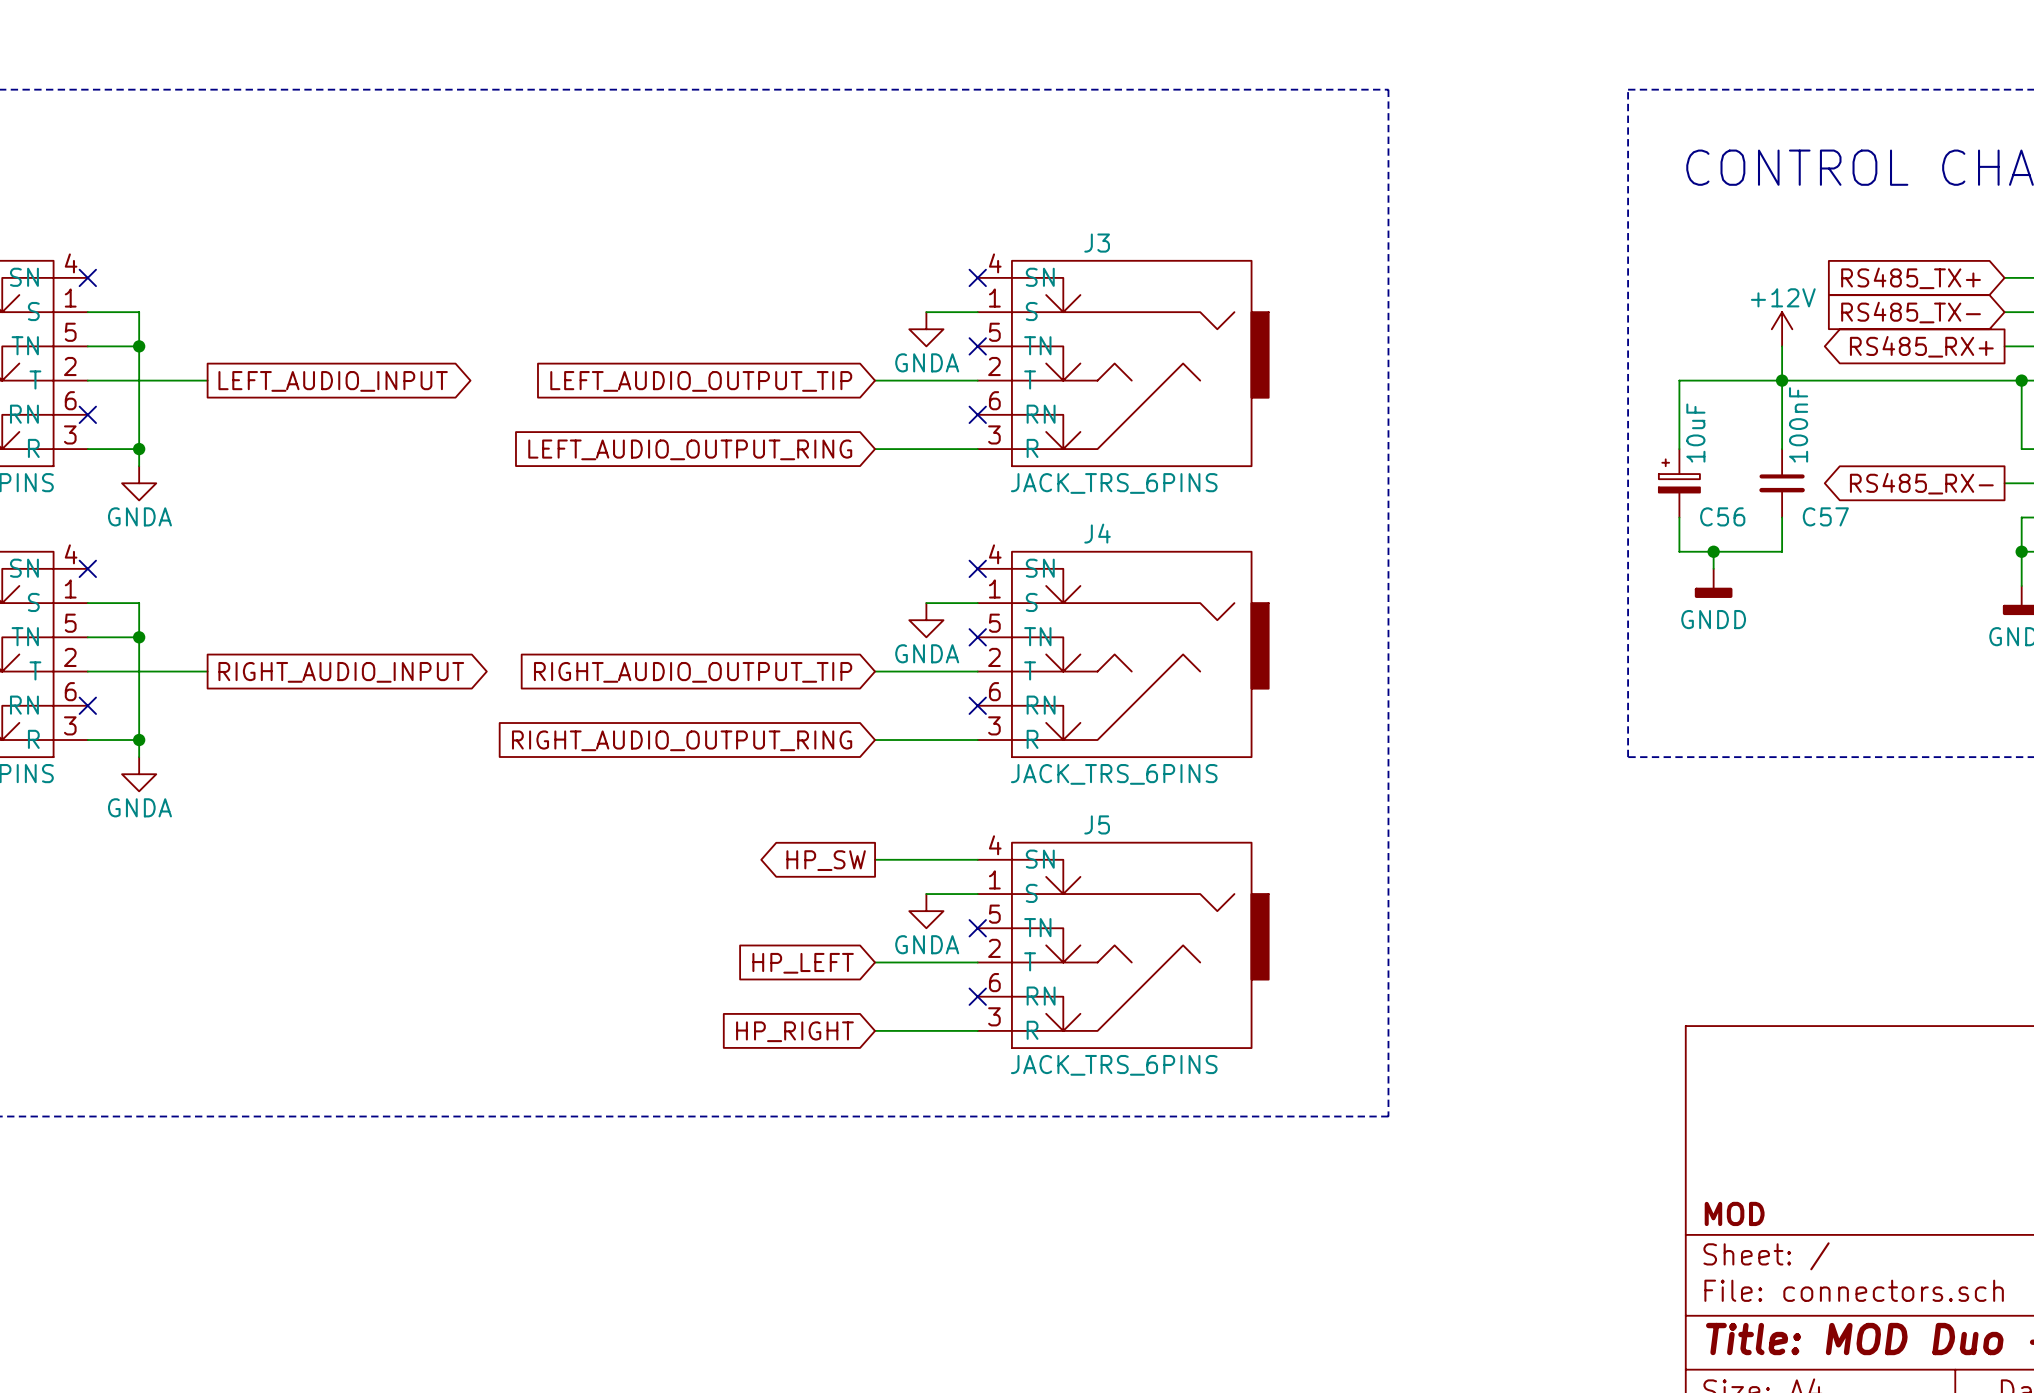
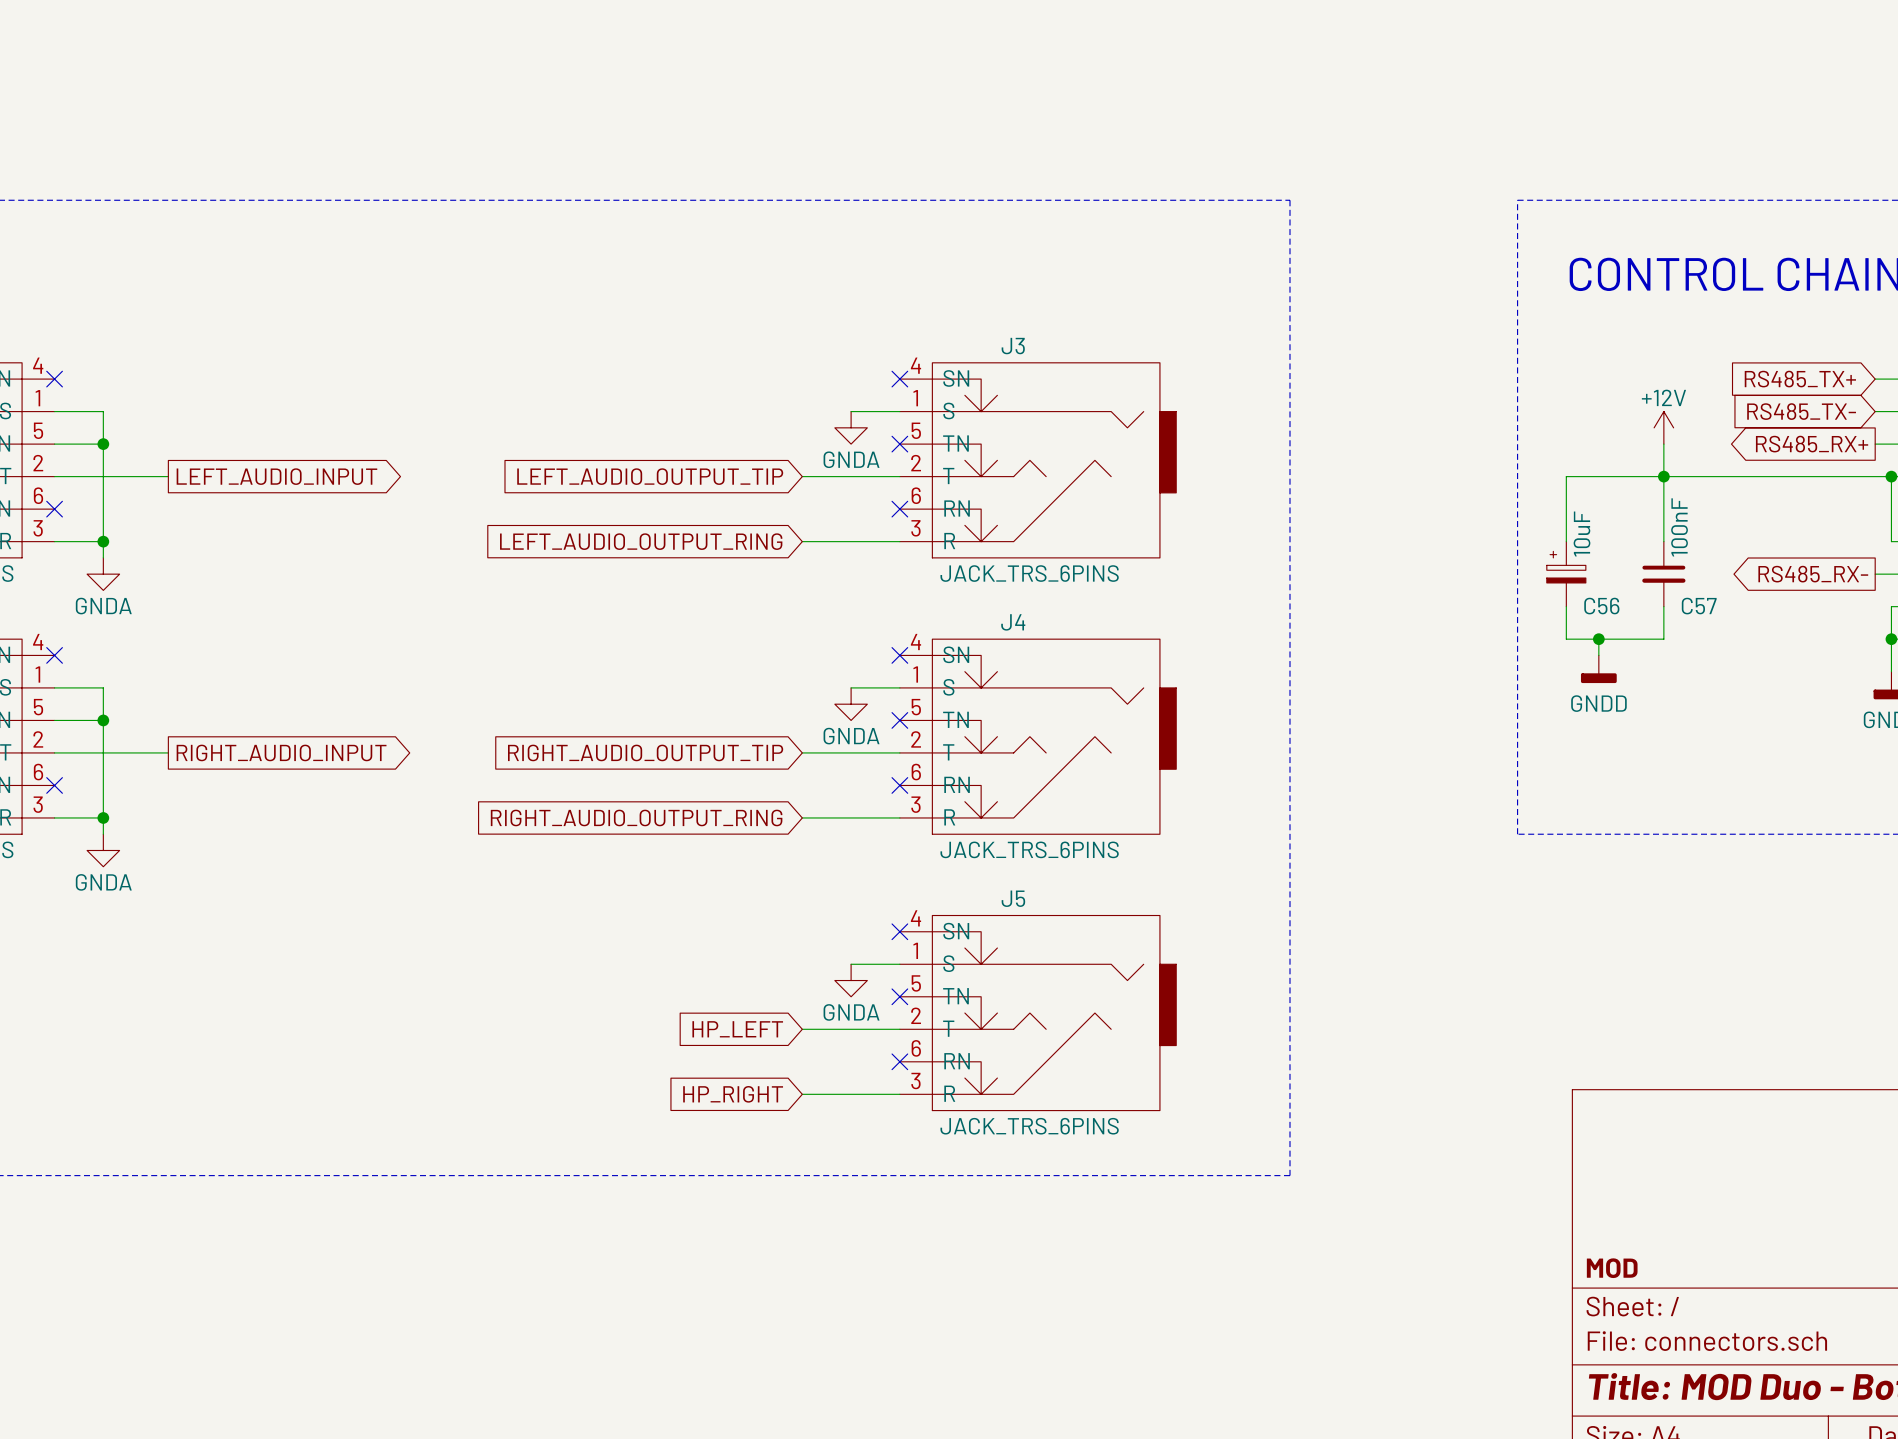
wire: (875, 859) (977, 859) -> none
no-connect mark: none -> (899, 931)
global label: HP_SW (826, 860) -> none

